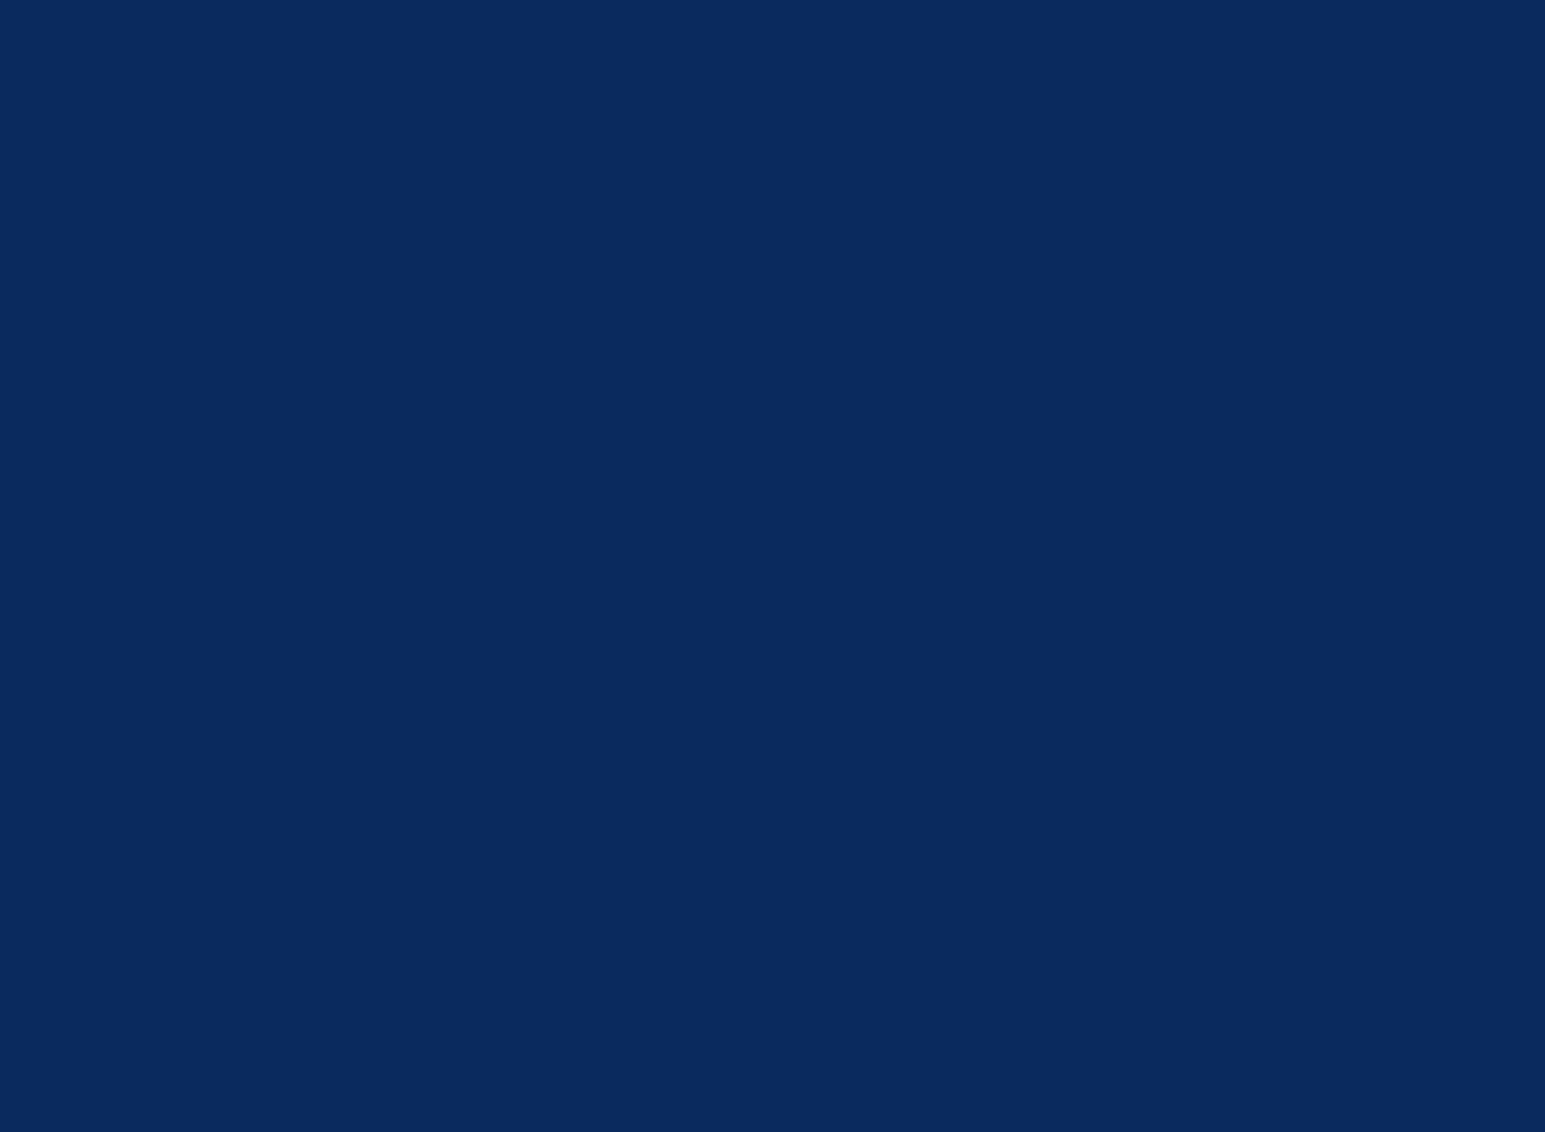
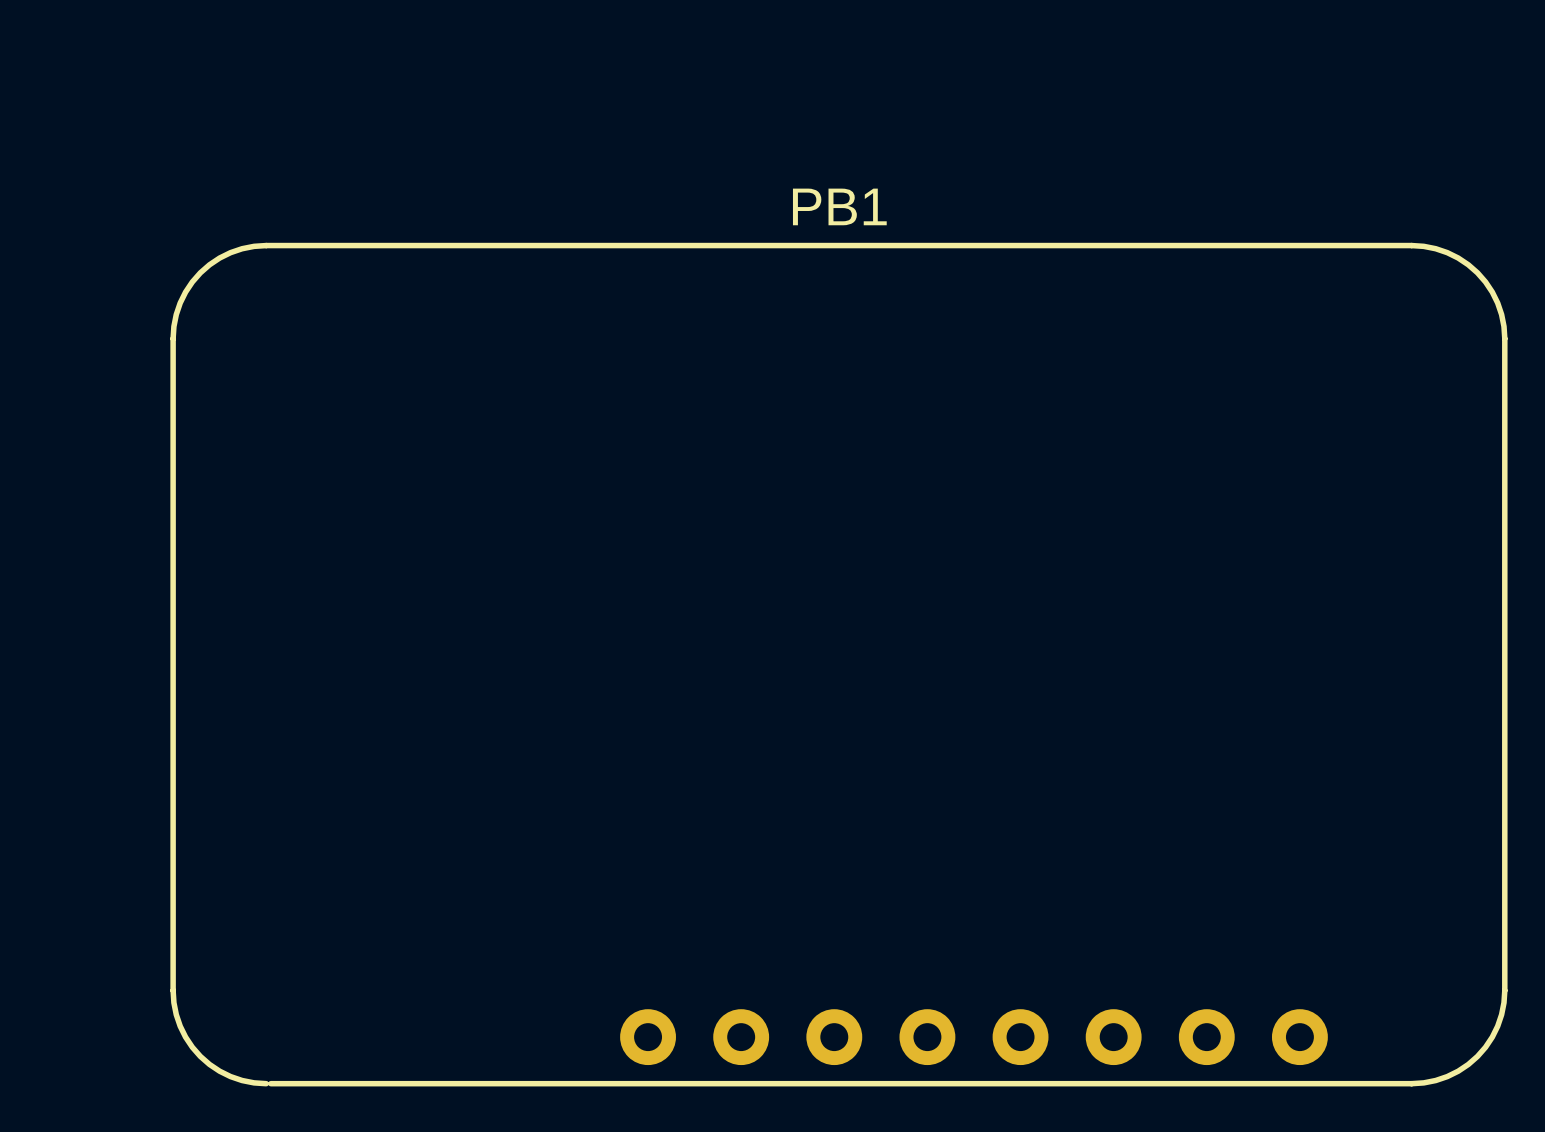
PB1: none -> (838, 664)

